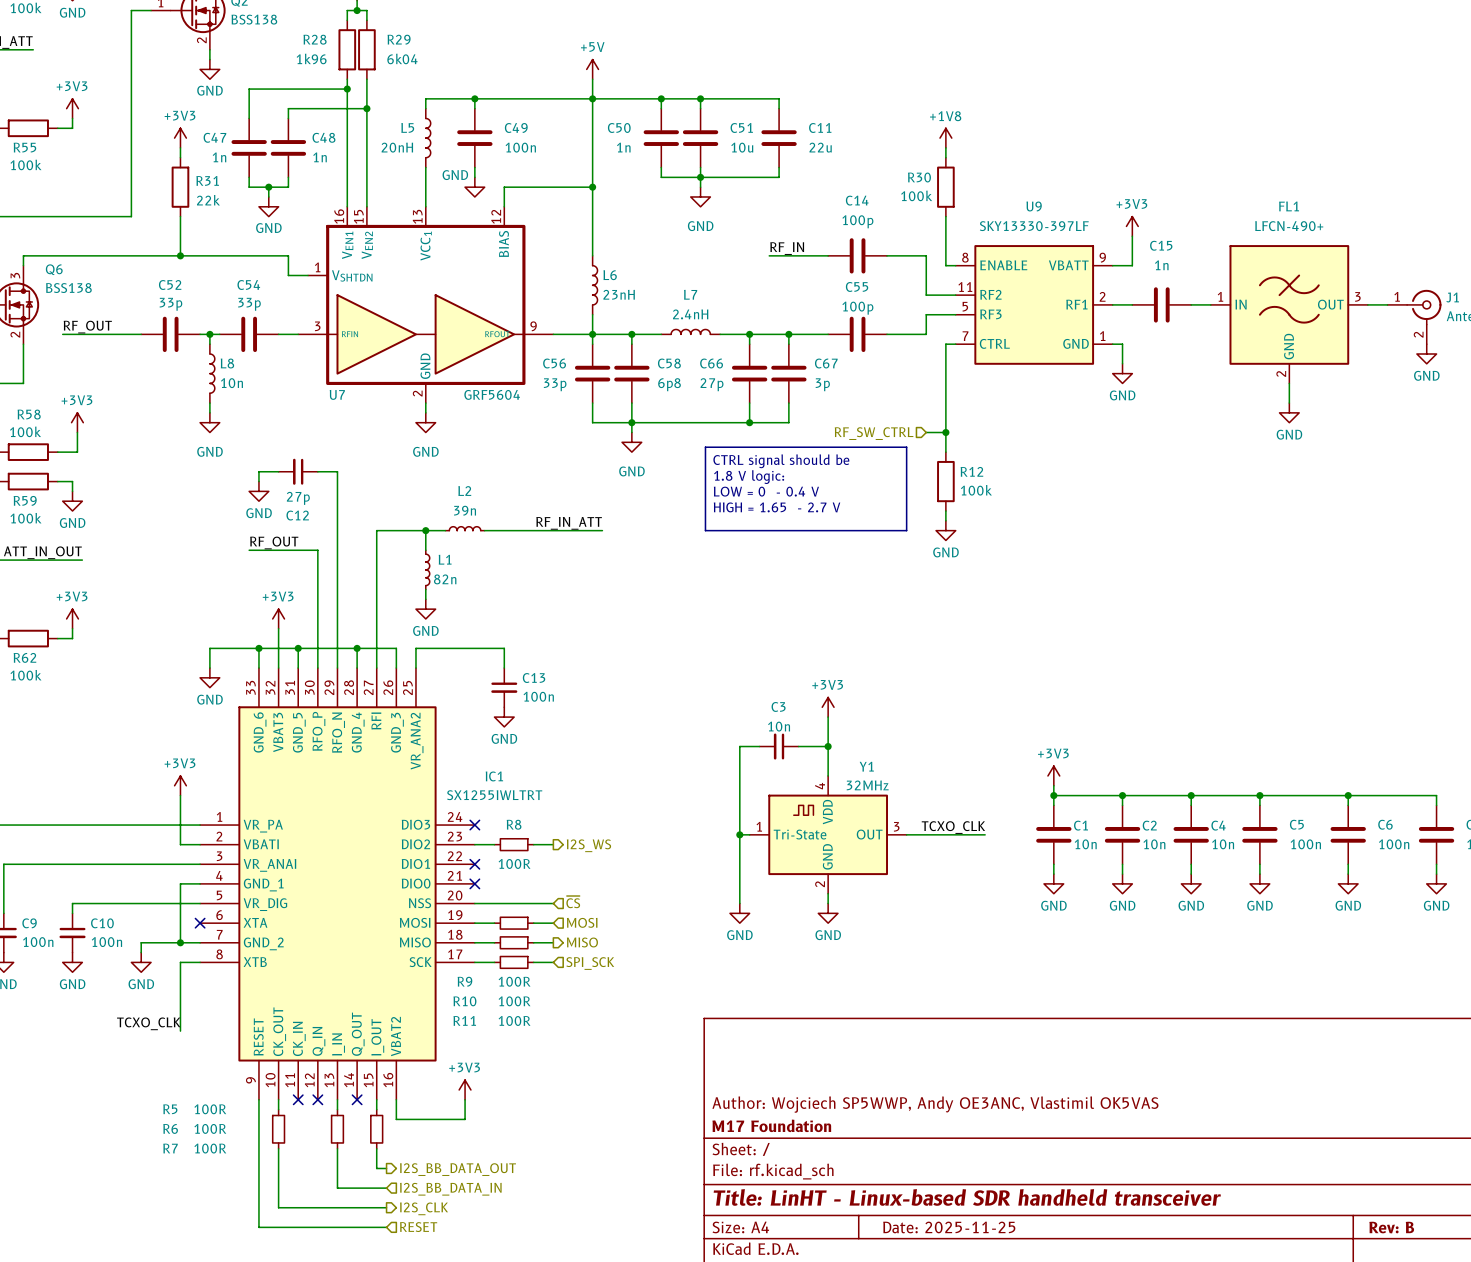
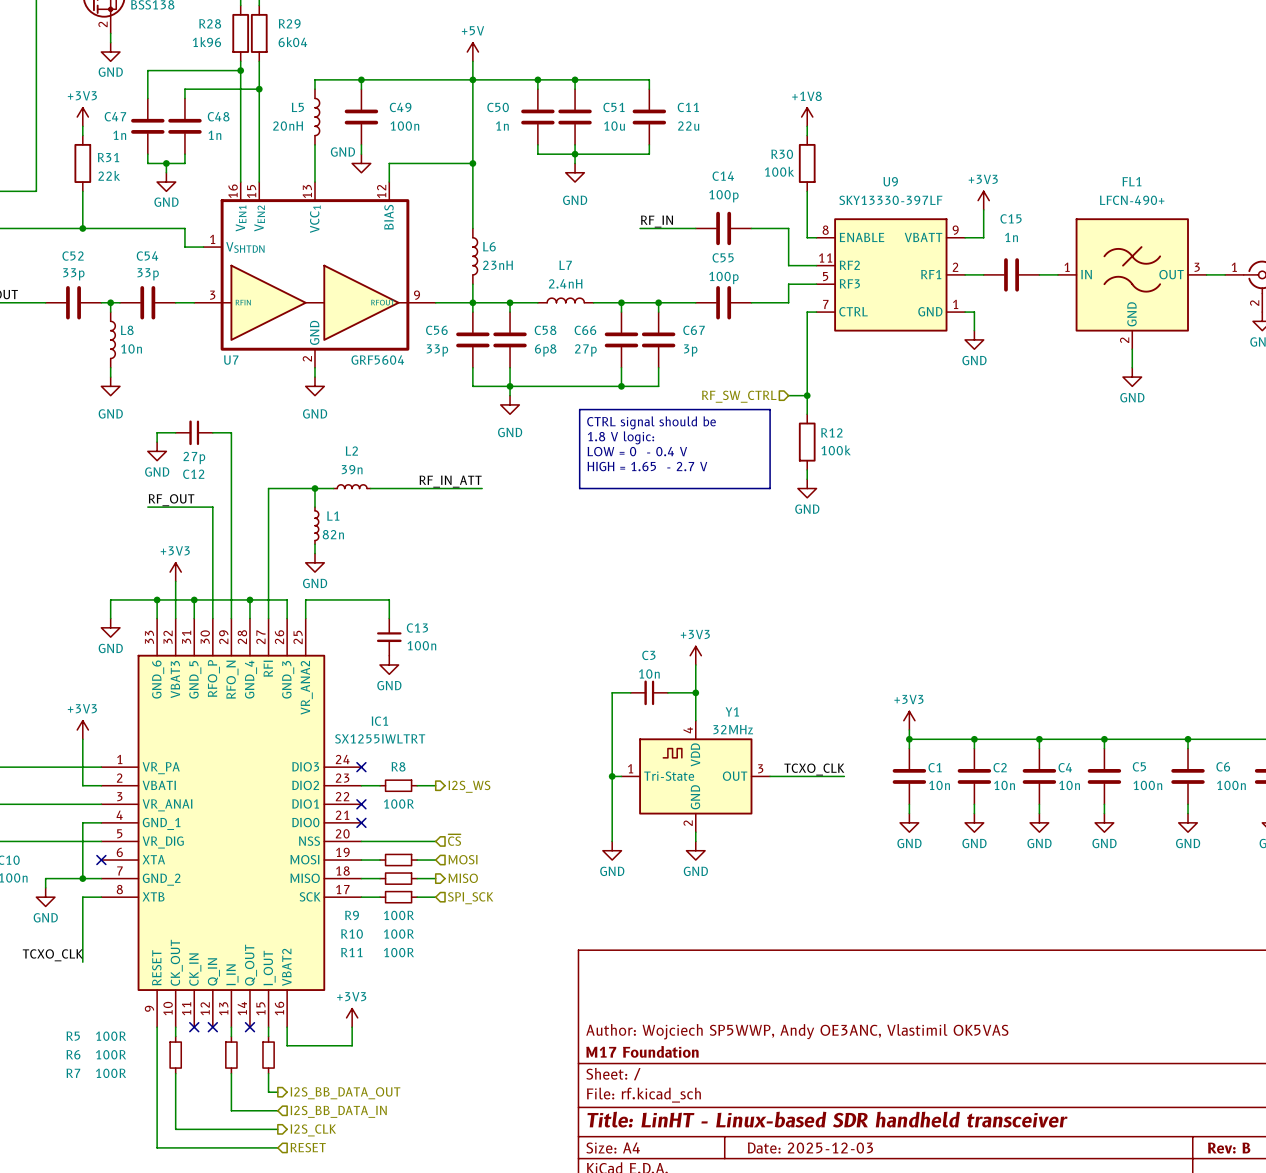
title block: Date: 2025-11-25 (949, 1227) -> Date: 2025-12-03 (810, 1148)

